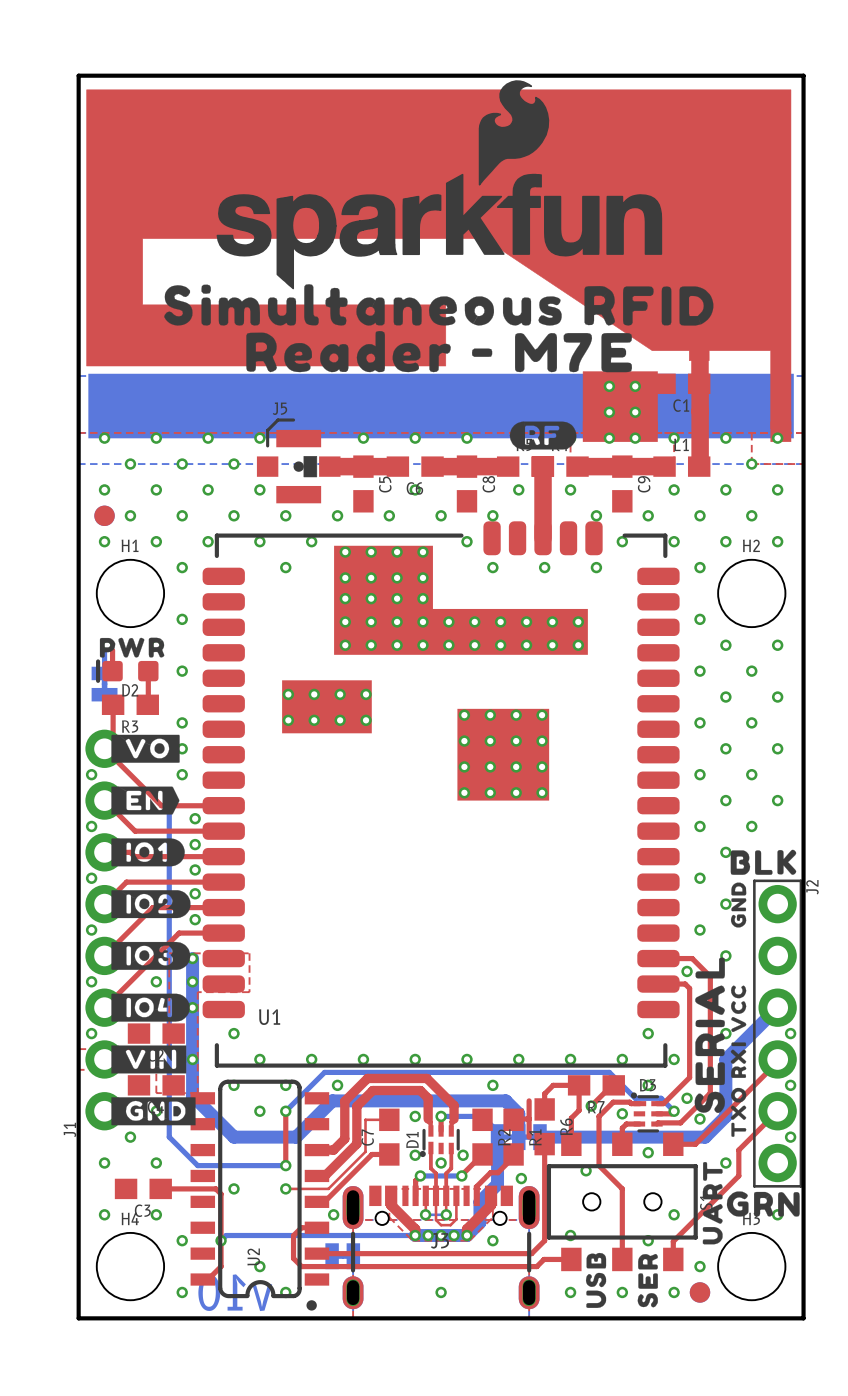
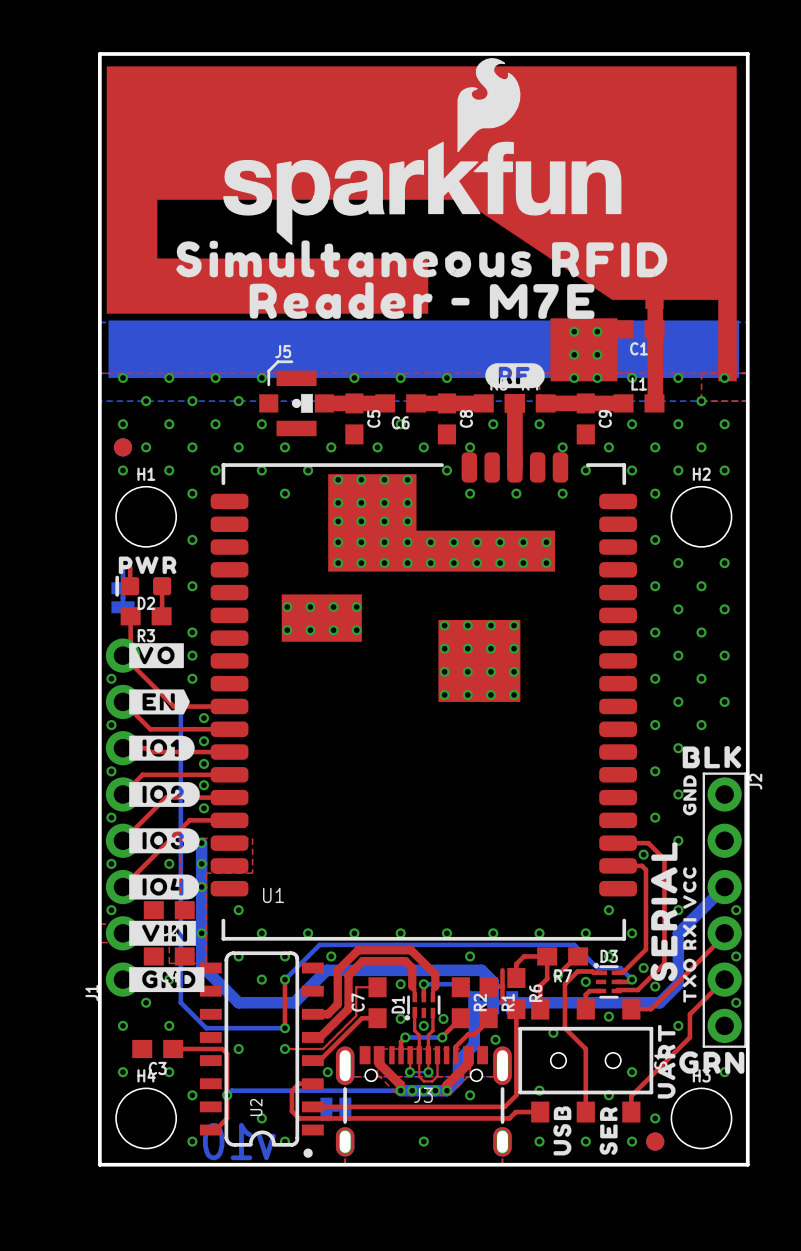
drawing shape: [111, 734, 180, 763] -> [129, 643, 184, 669]

